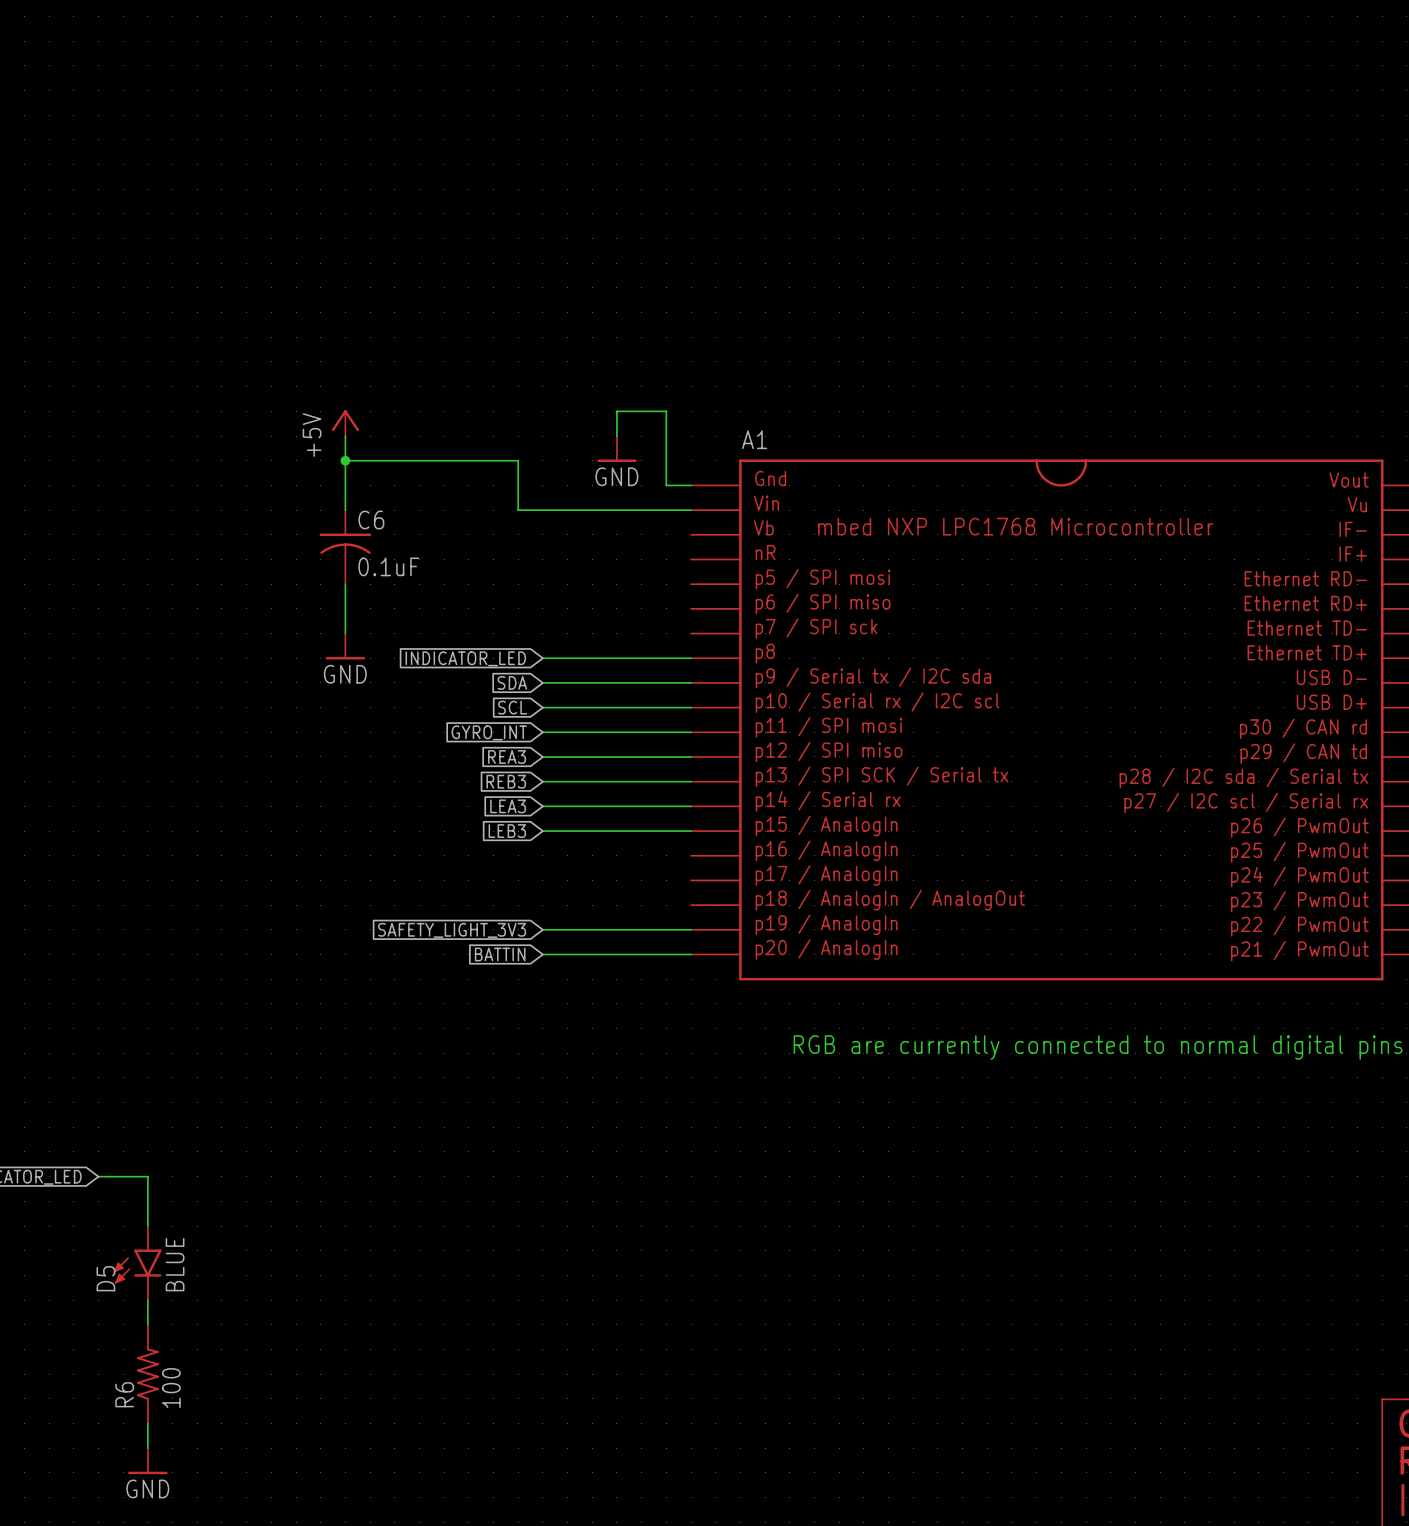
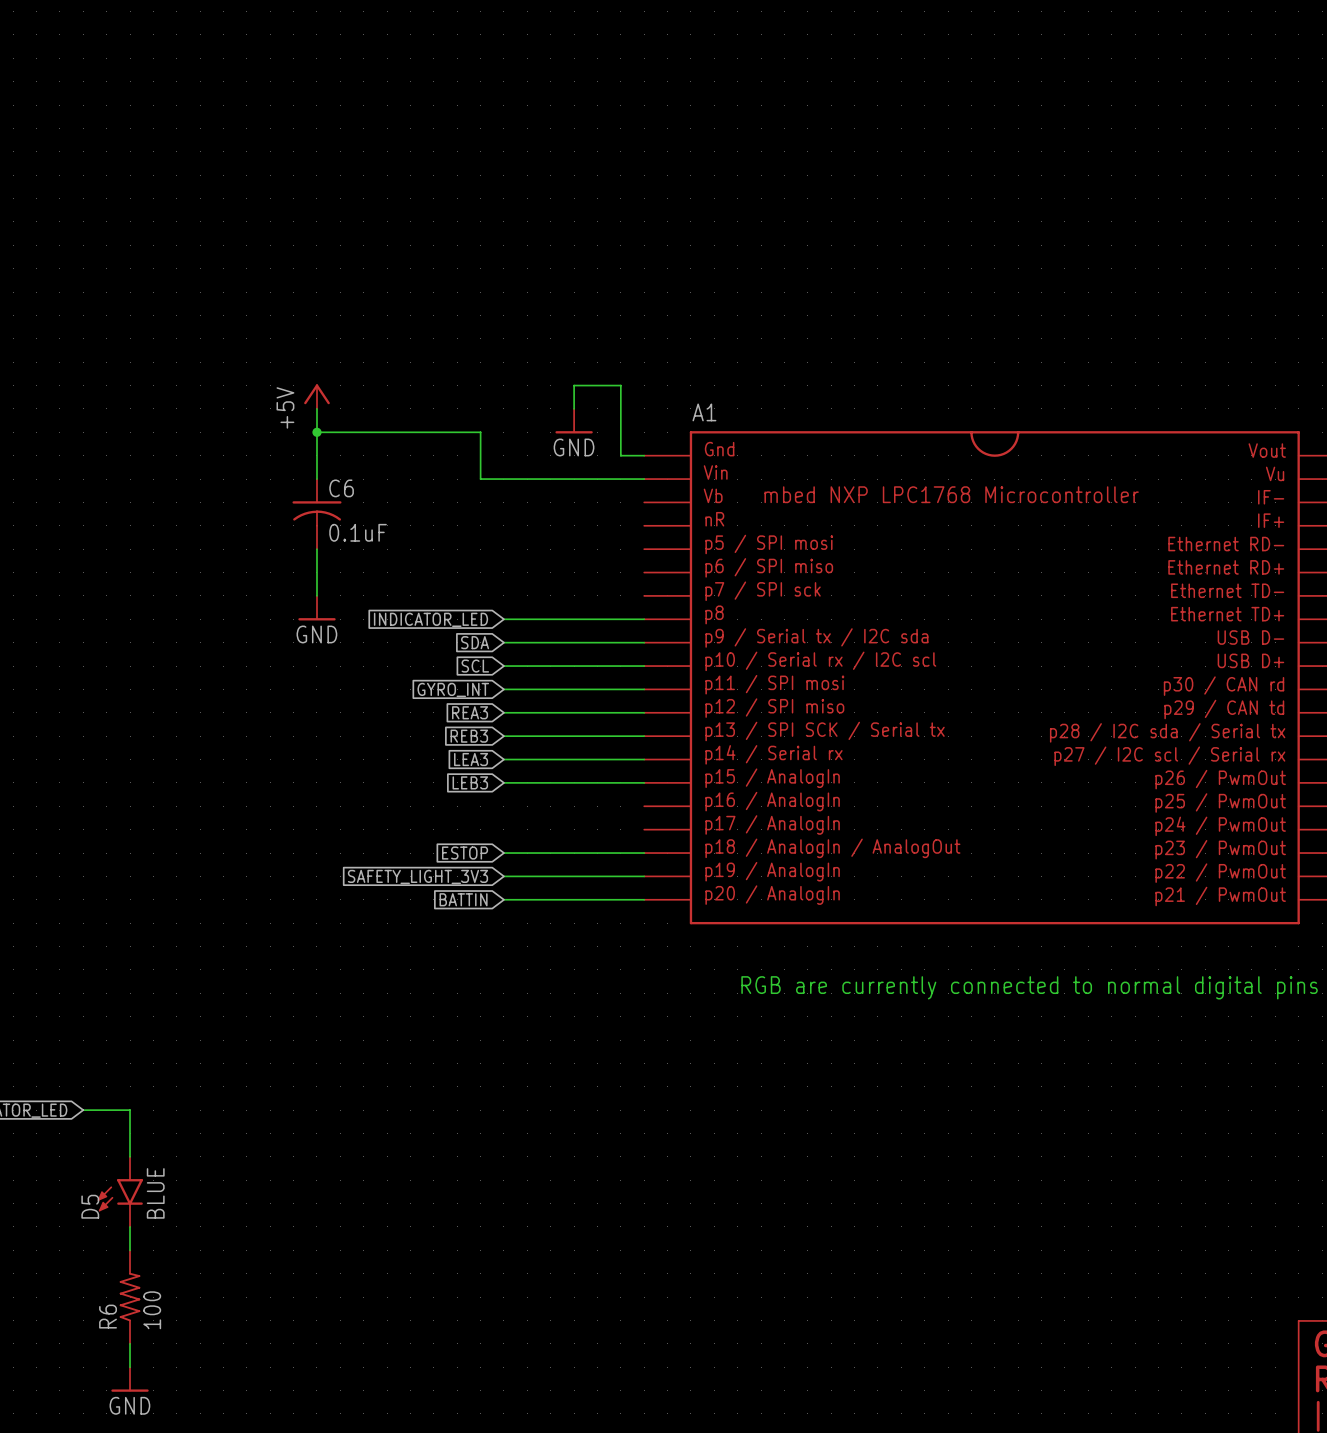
global label: none -> ESTOP (465, 853)
wire: none -> (503, 853) (644, 853)

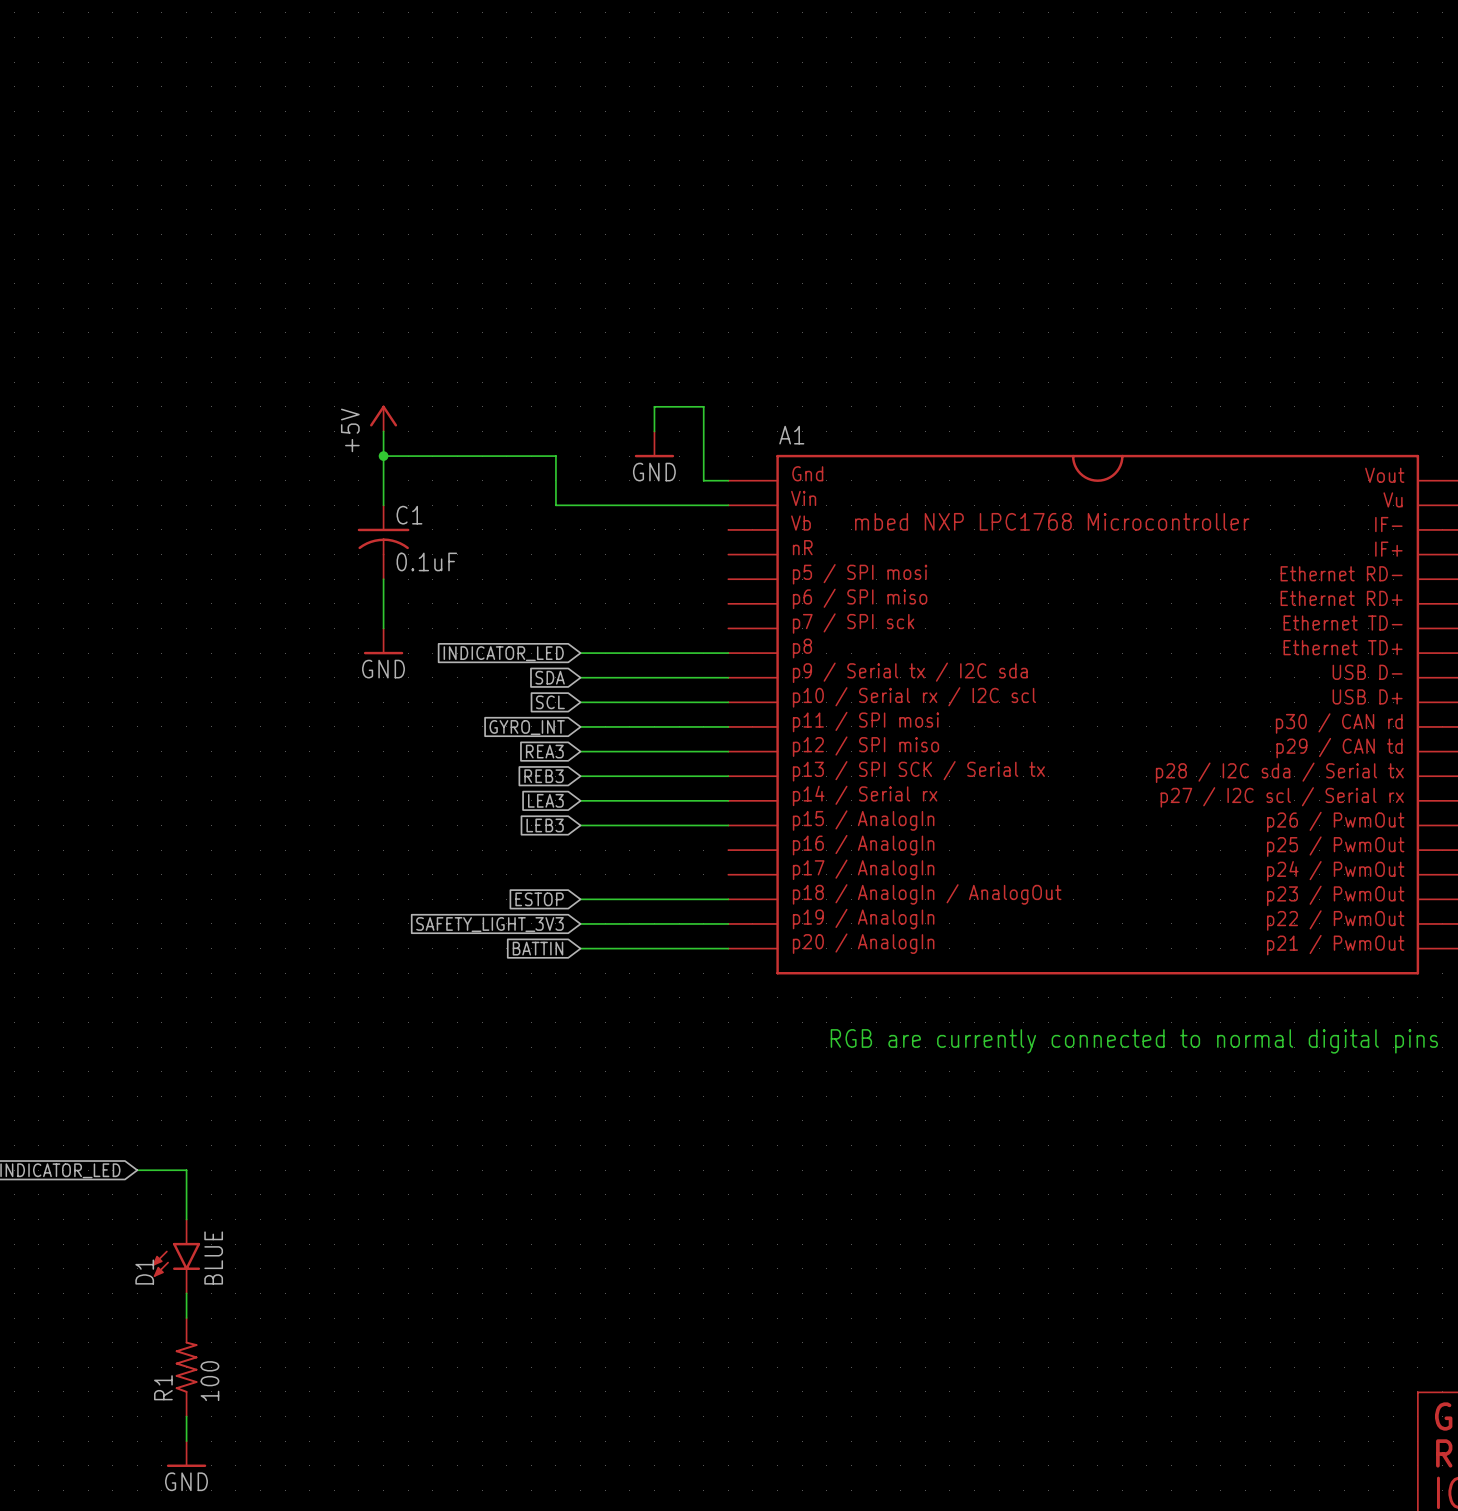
C6 name: C6 (341, 488) -> C1 (409, 515)
D5 name: D5 (90, 1206) -> D1 (144, 1272)
R6 name: R6 (108, 1316) -> R1 (163, 1387)

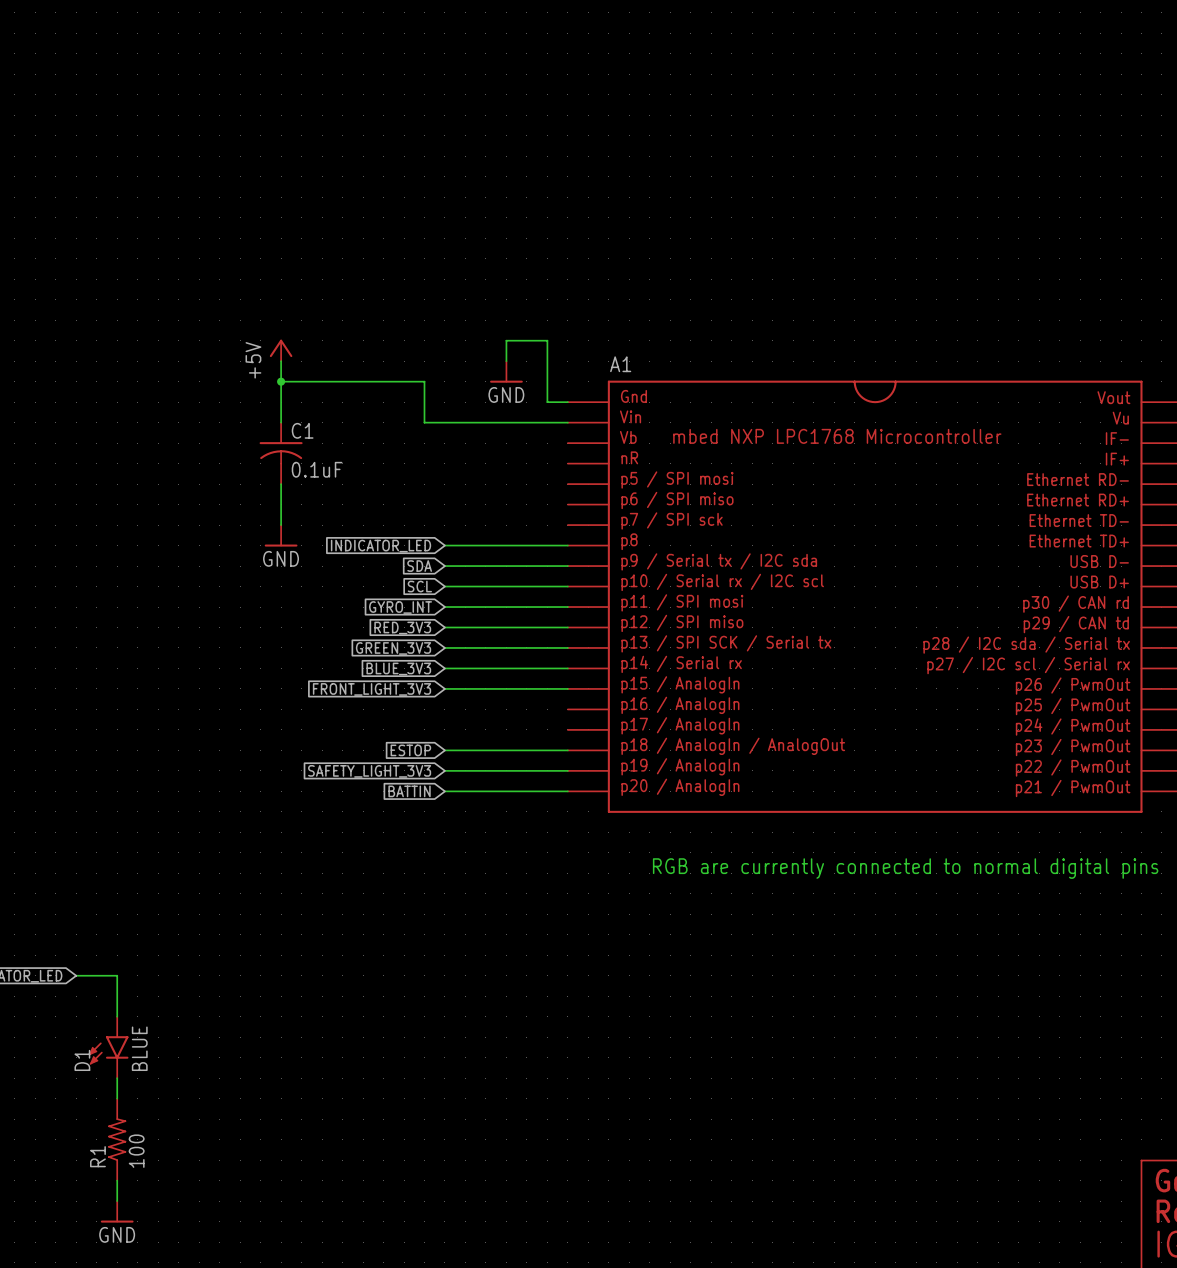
global label: REA3 (544, 751) -> RED_3V3 (402, 627)
global label: REB3 (544, 776) -> GREEN_3V3 (393, 648)
global label: LEA3 (545, 800) -> BLUE_3V3 (398, 668)
global label: LEB3 (545, 825) -> FRONT_LIGHT_3V3 (372, 689)

